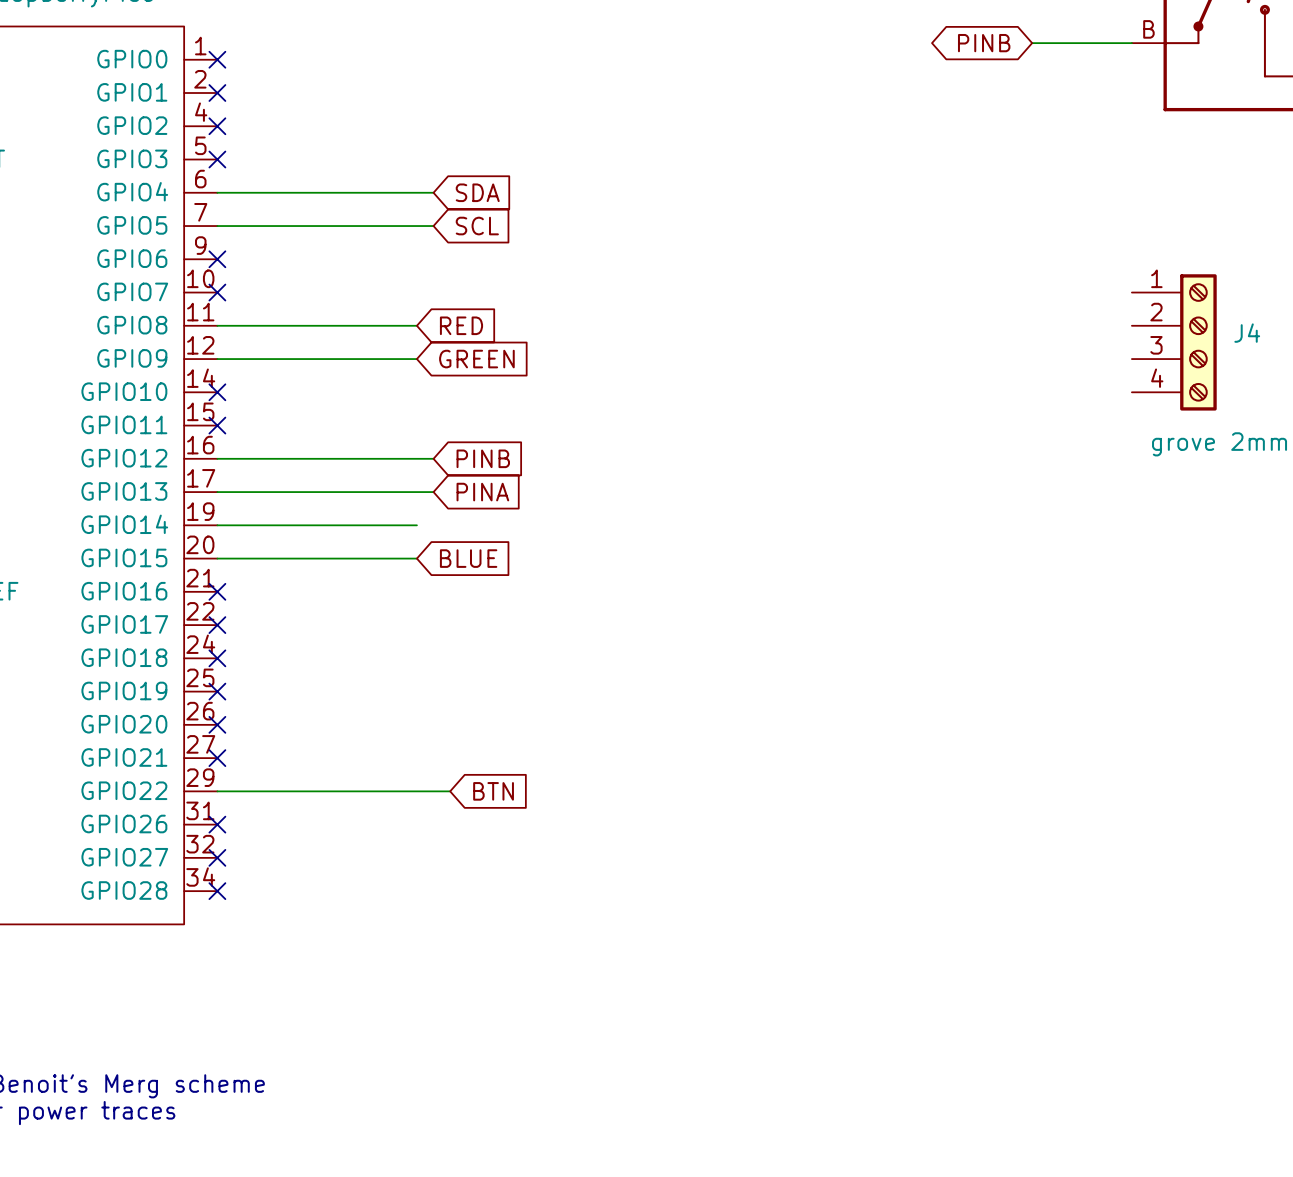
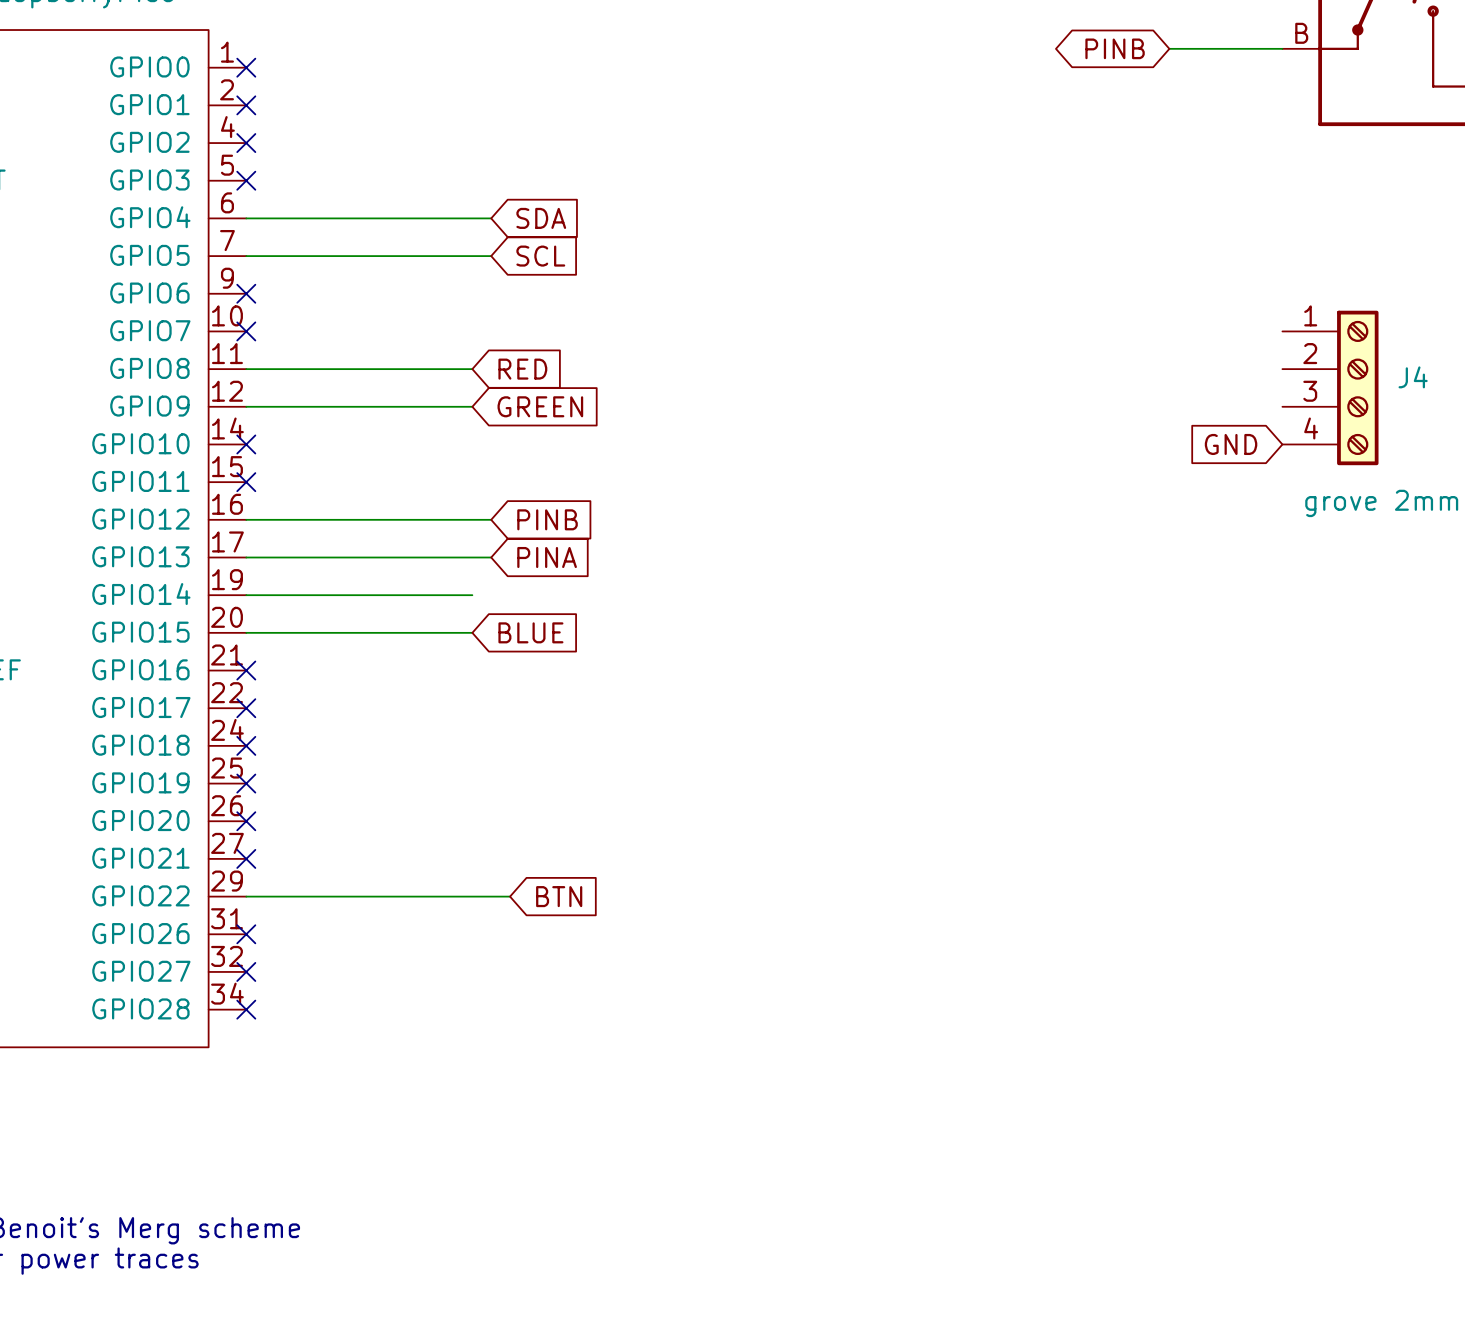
global label: none -> GND (1231, 444)

